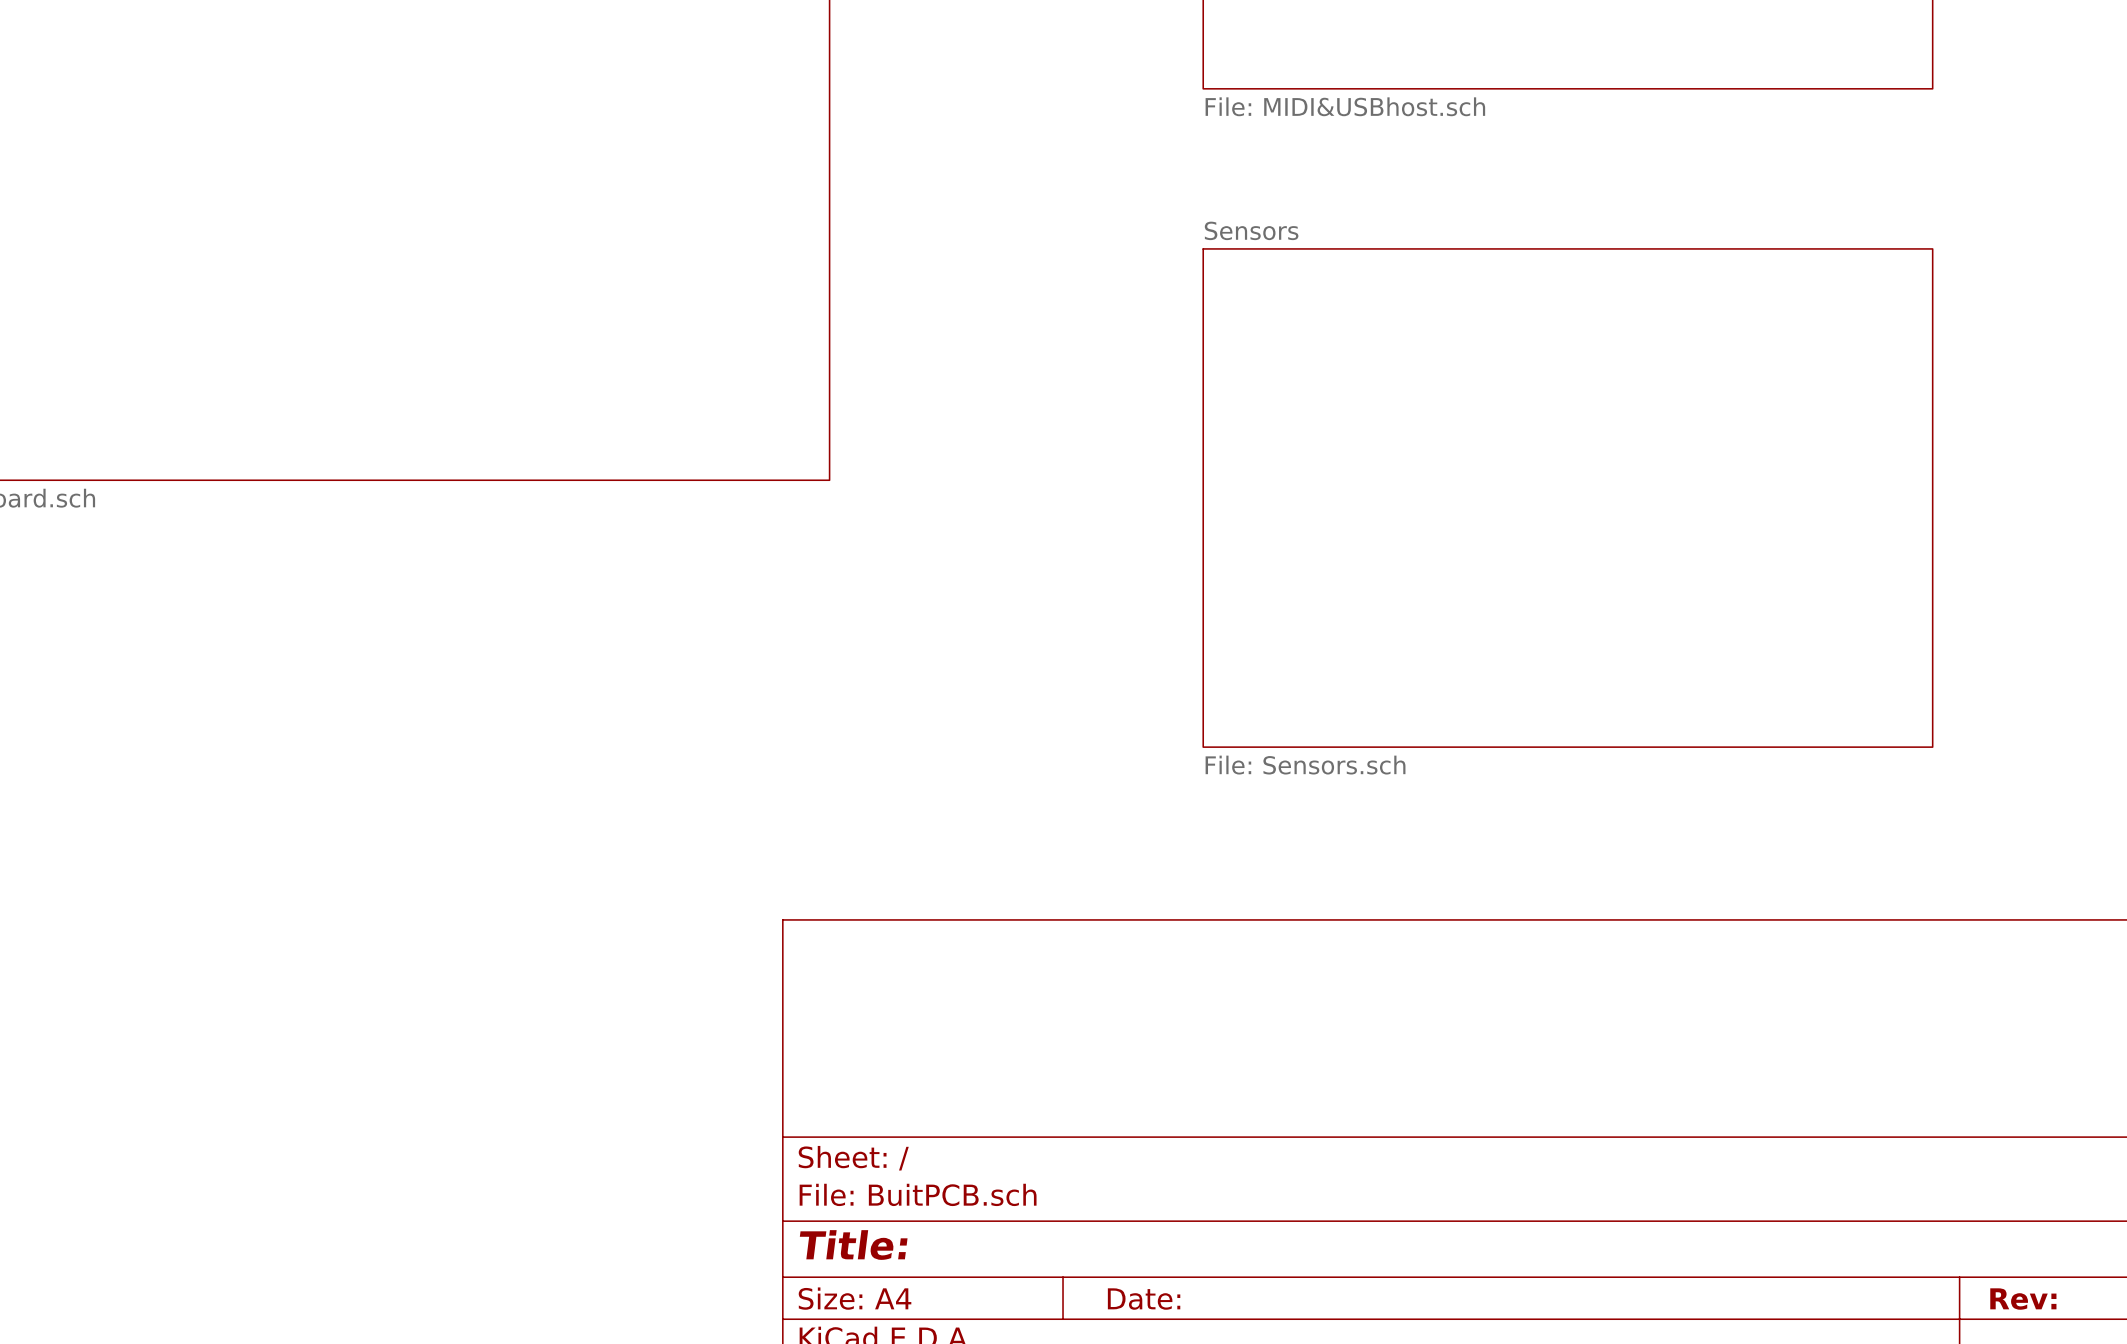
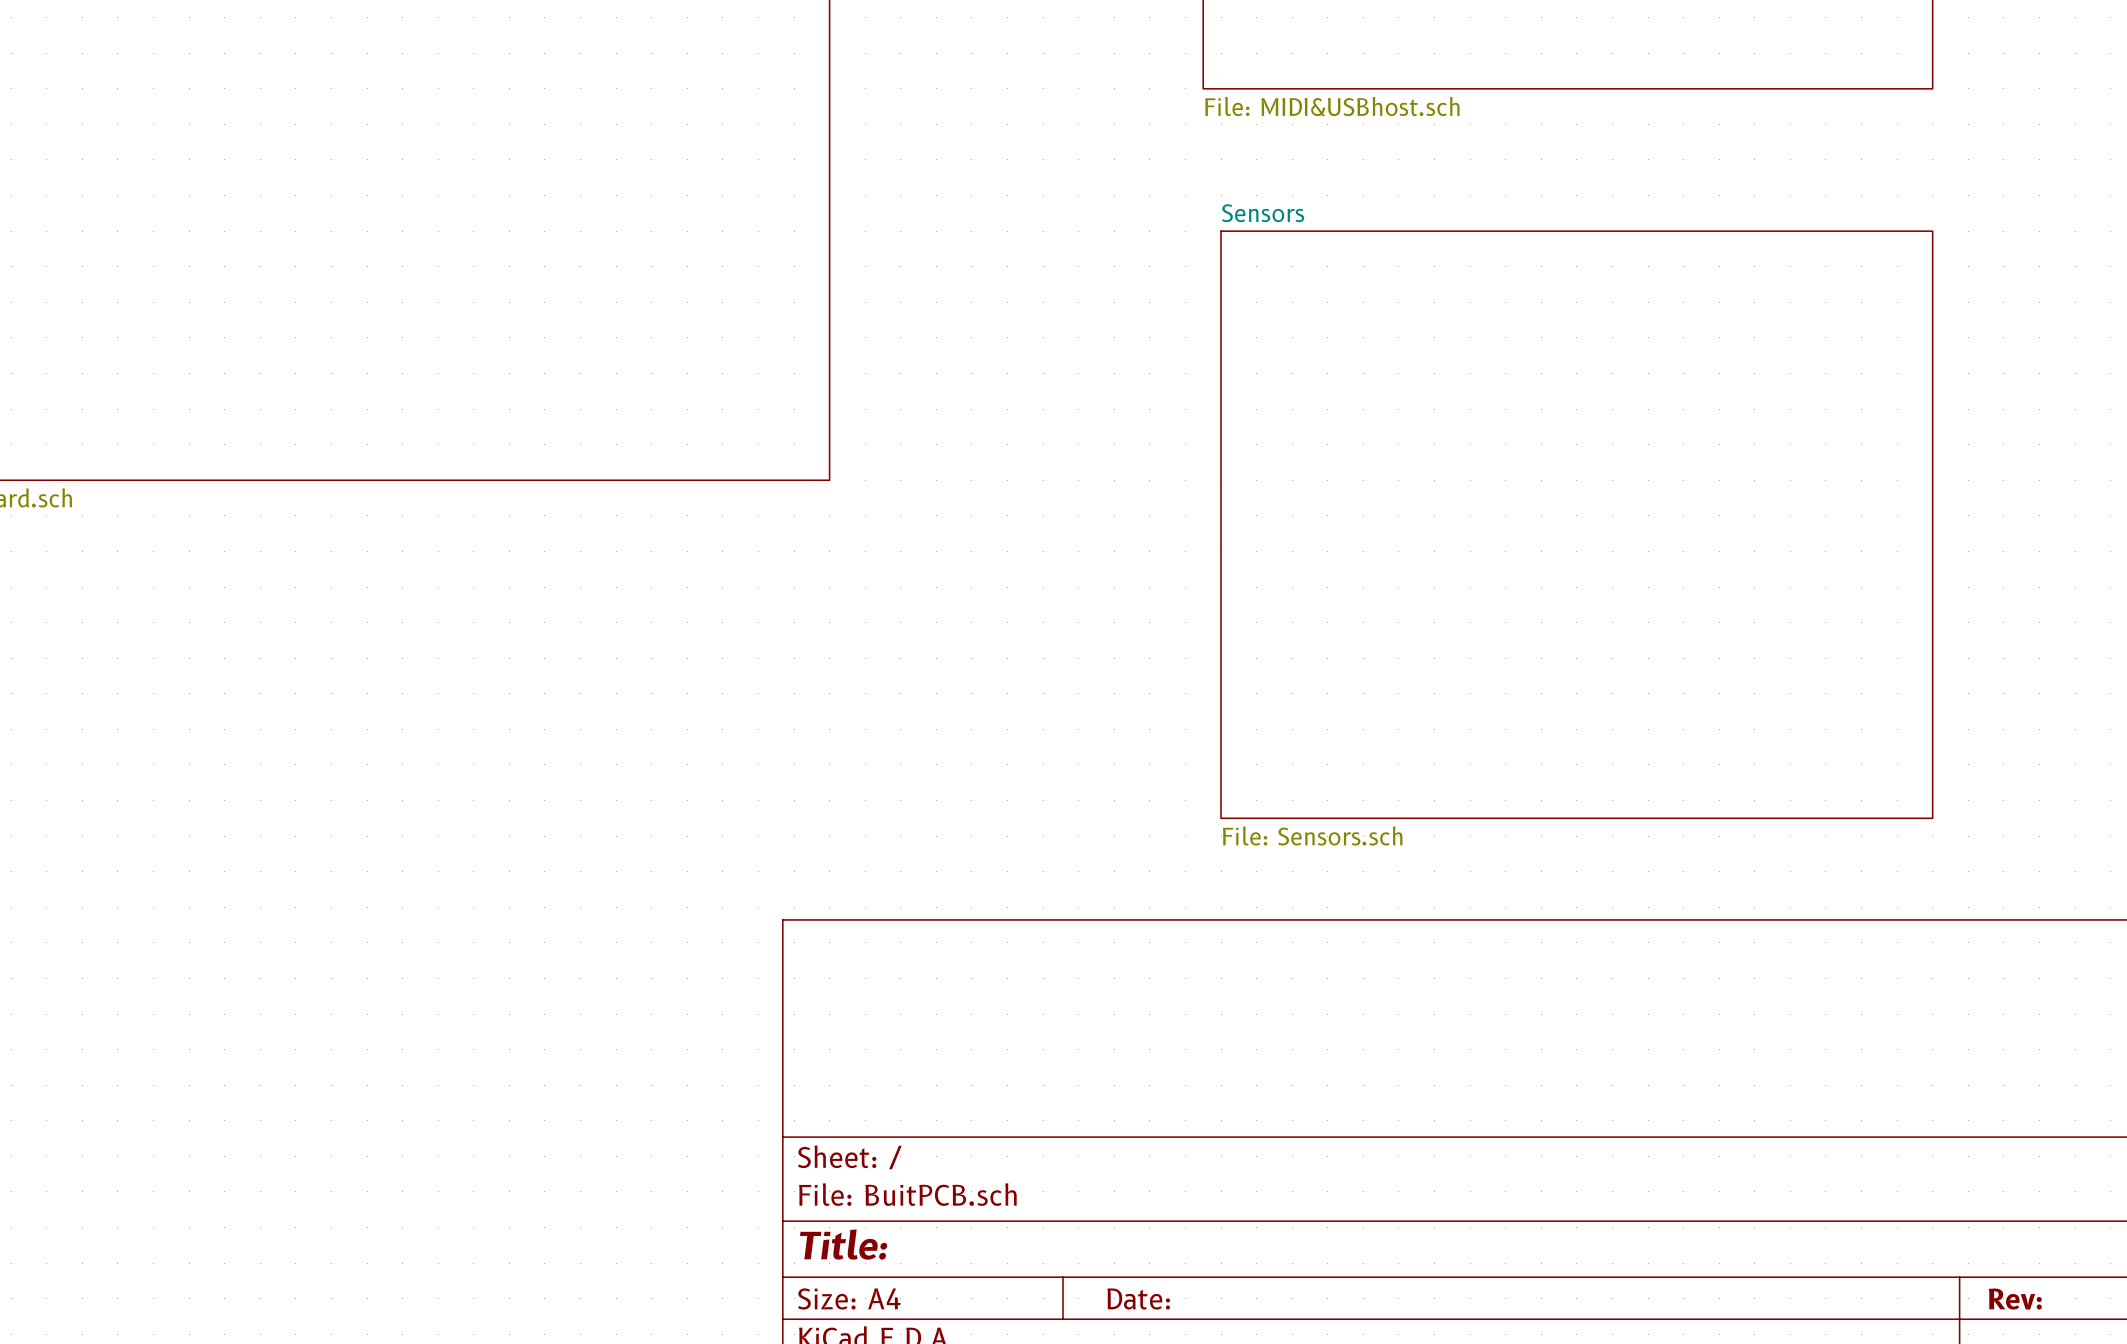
sheet Sensors: File: Sensors.sch (1567, 498) -> none
sheet Sensors: none -> File: Sensors.sch (1576, 524)

